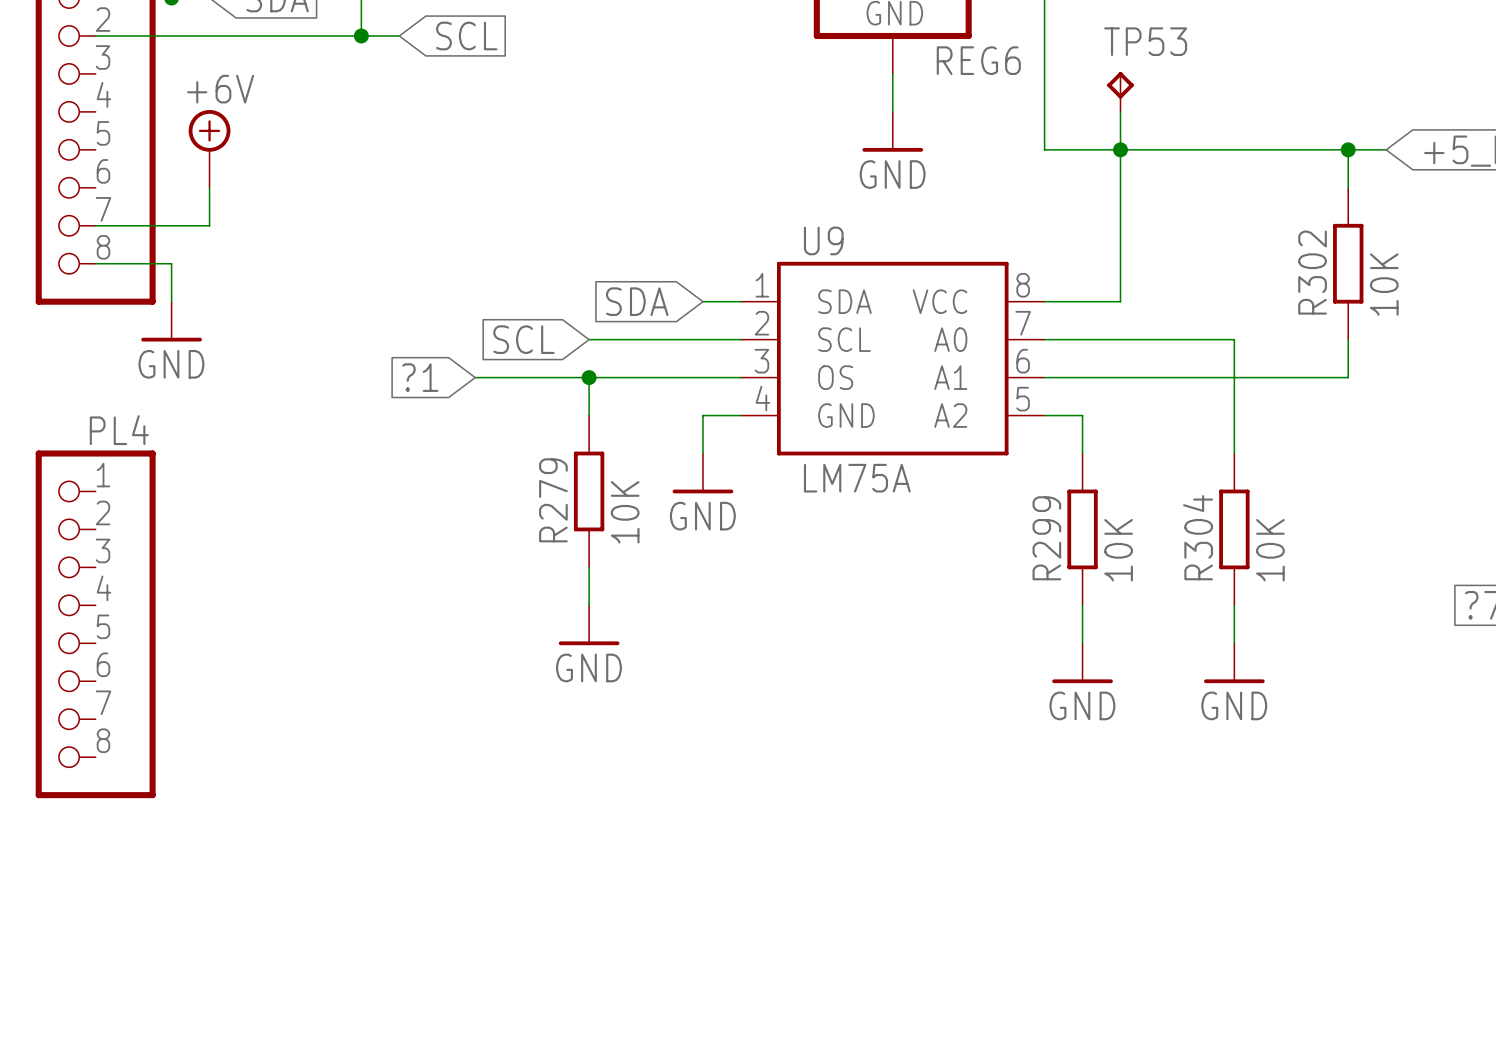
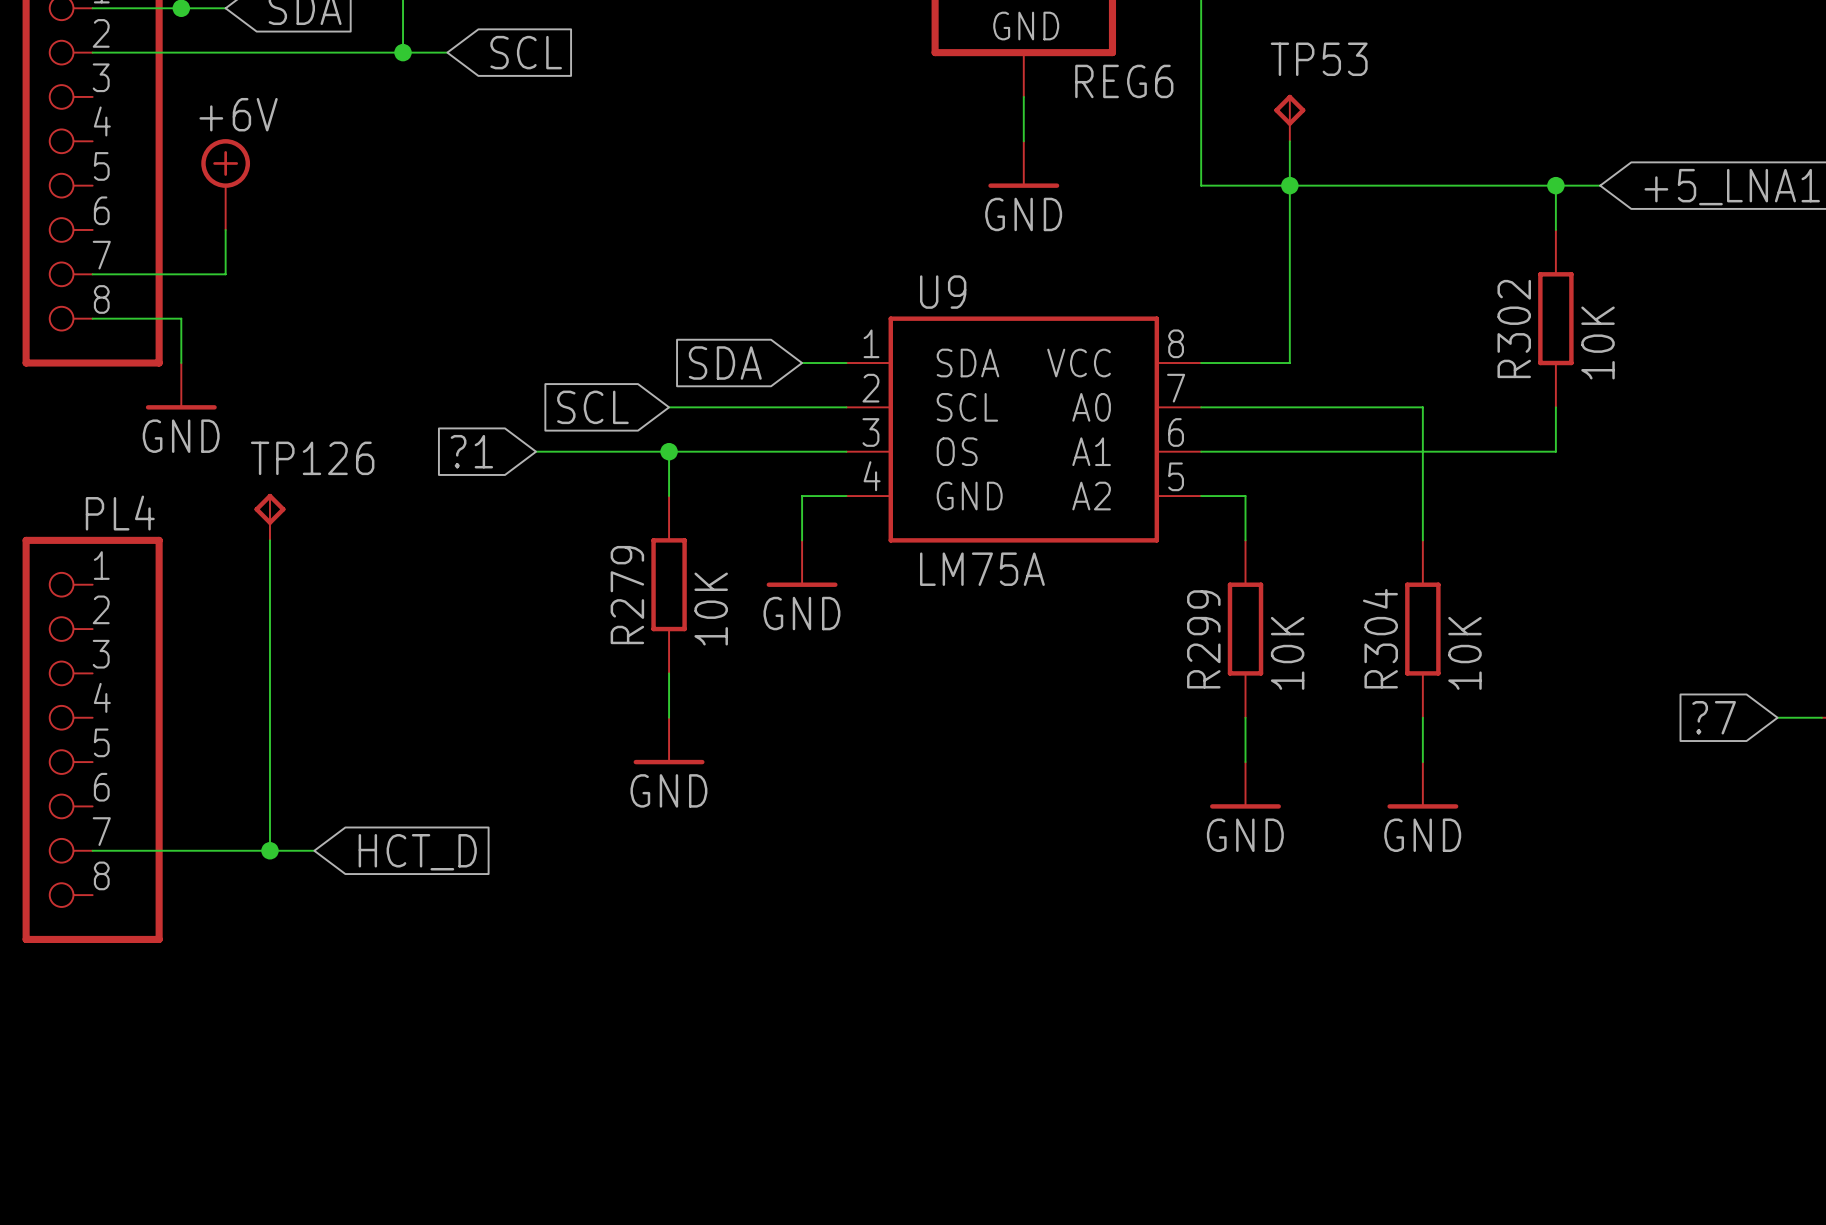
TP126: none -> (269, 517)
wire: none -> (269, 540) (269, 850)
wire: none -> (92, 850) (314, 850)
junction: none -> (269, 850)
global label: none -> HCT_D (417, 852)

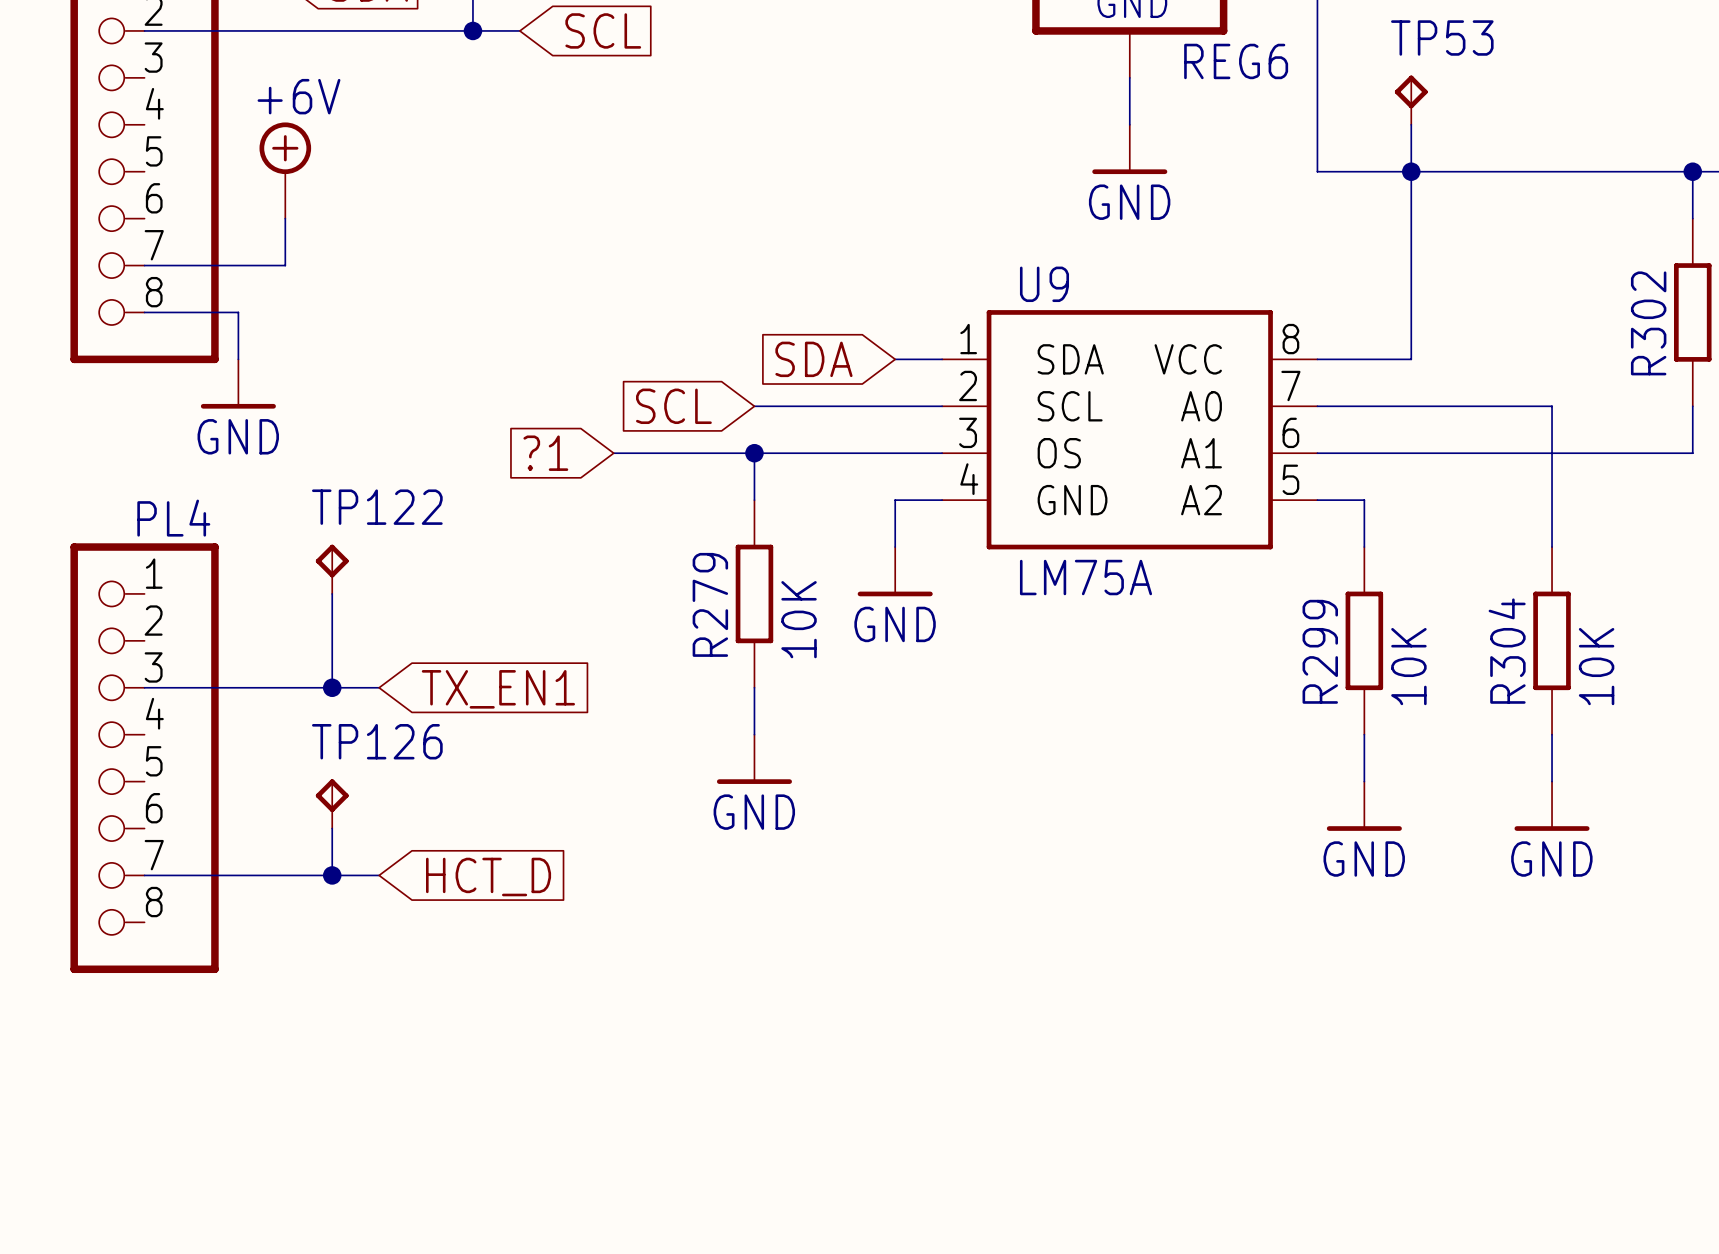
TP126 position: (269, 517) -> (332, 803)
TP122: none -> (332, 569)
wire: none -> (144, 687) (379, 687)
wire: (269, 673) (269, 806) -> none
junction: none -> (332, 687)
global label: none -> TX_EN1 (498, 689)

